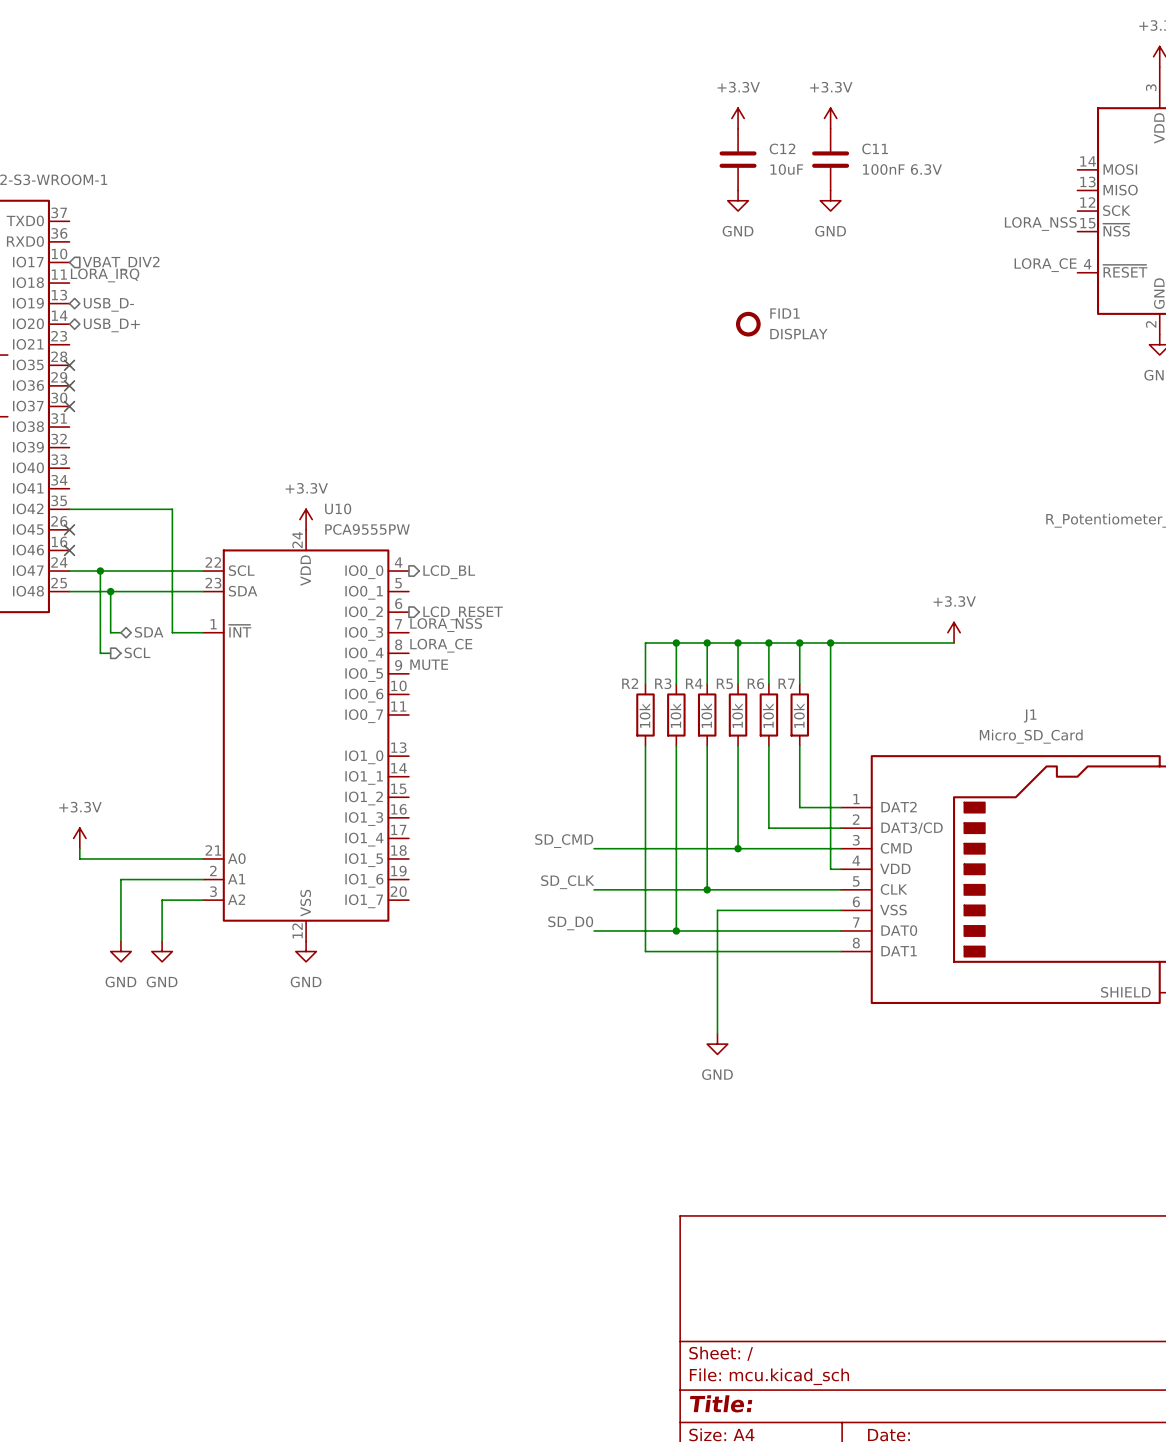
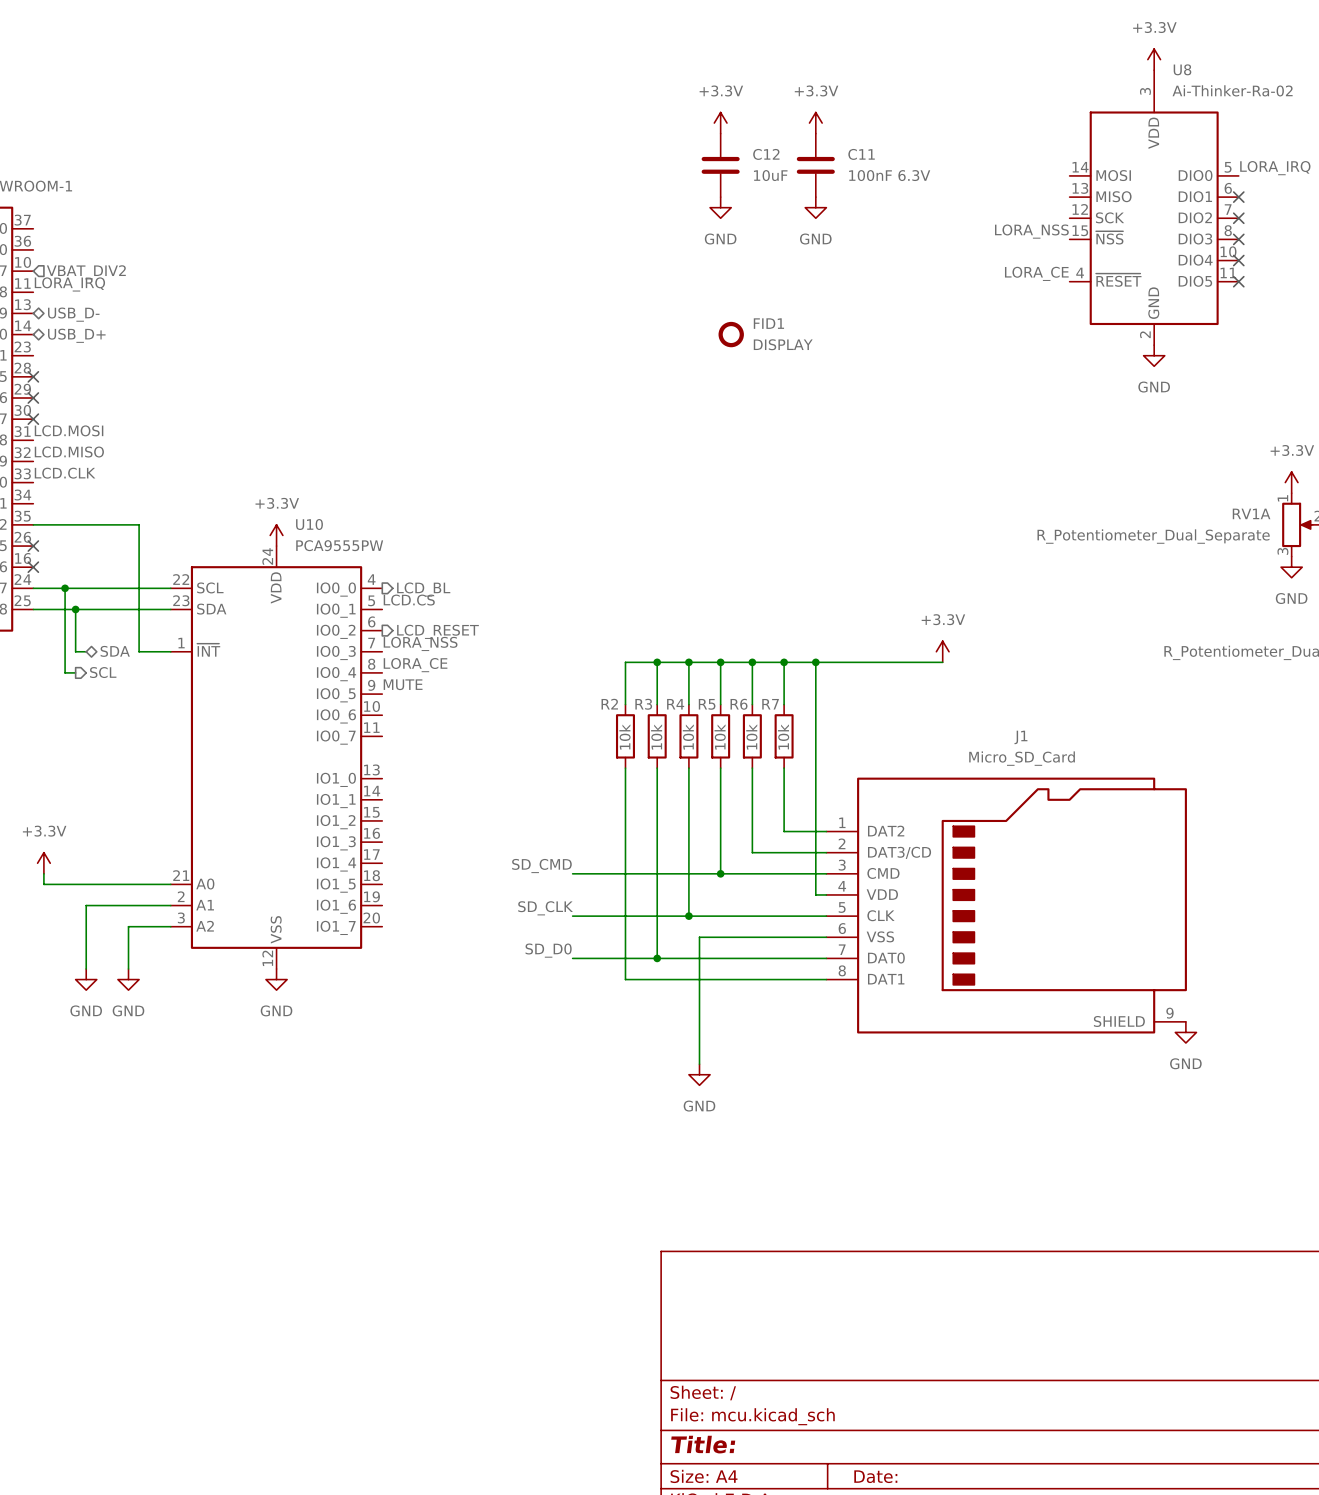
label: none -> LCD.MOSI (69, 430)
label: none -> LCD.MISO (69, 452)
label: none -> LCD.CLK (65, 473)
label: none -> LCD.CS (409, 600)

